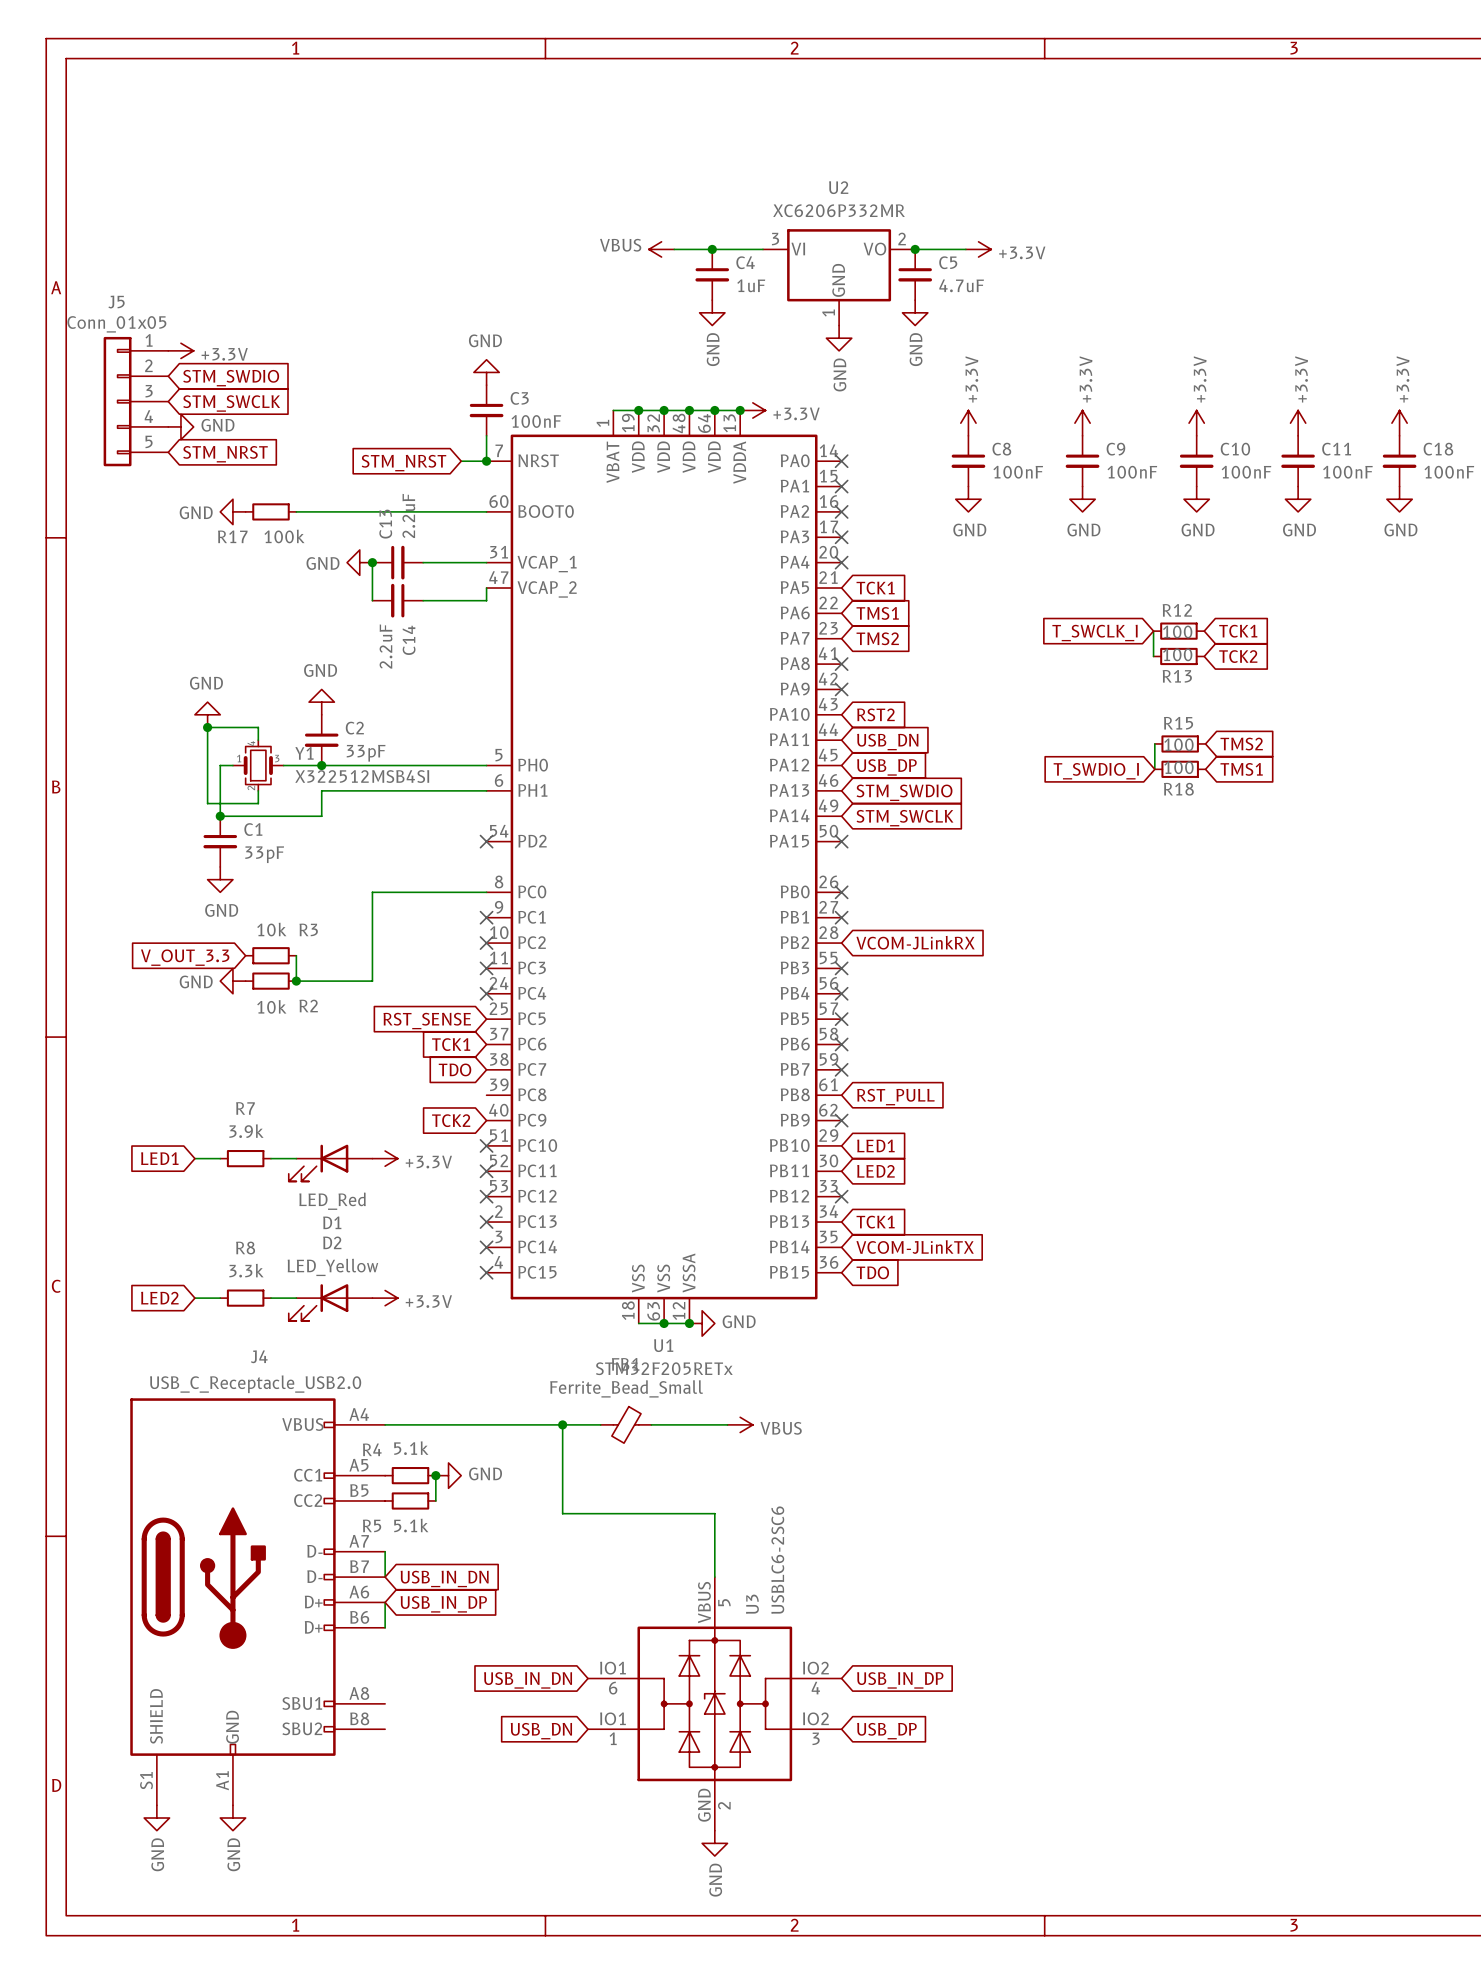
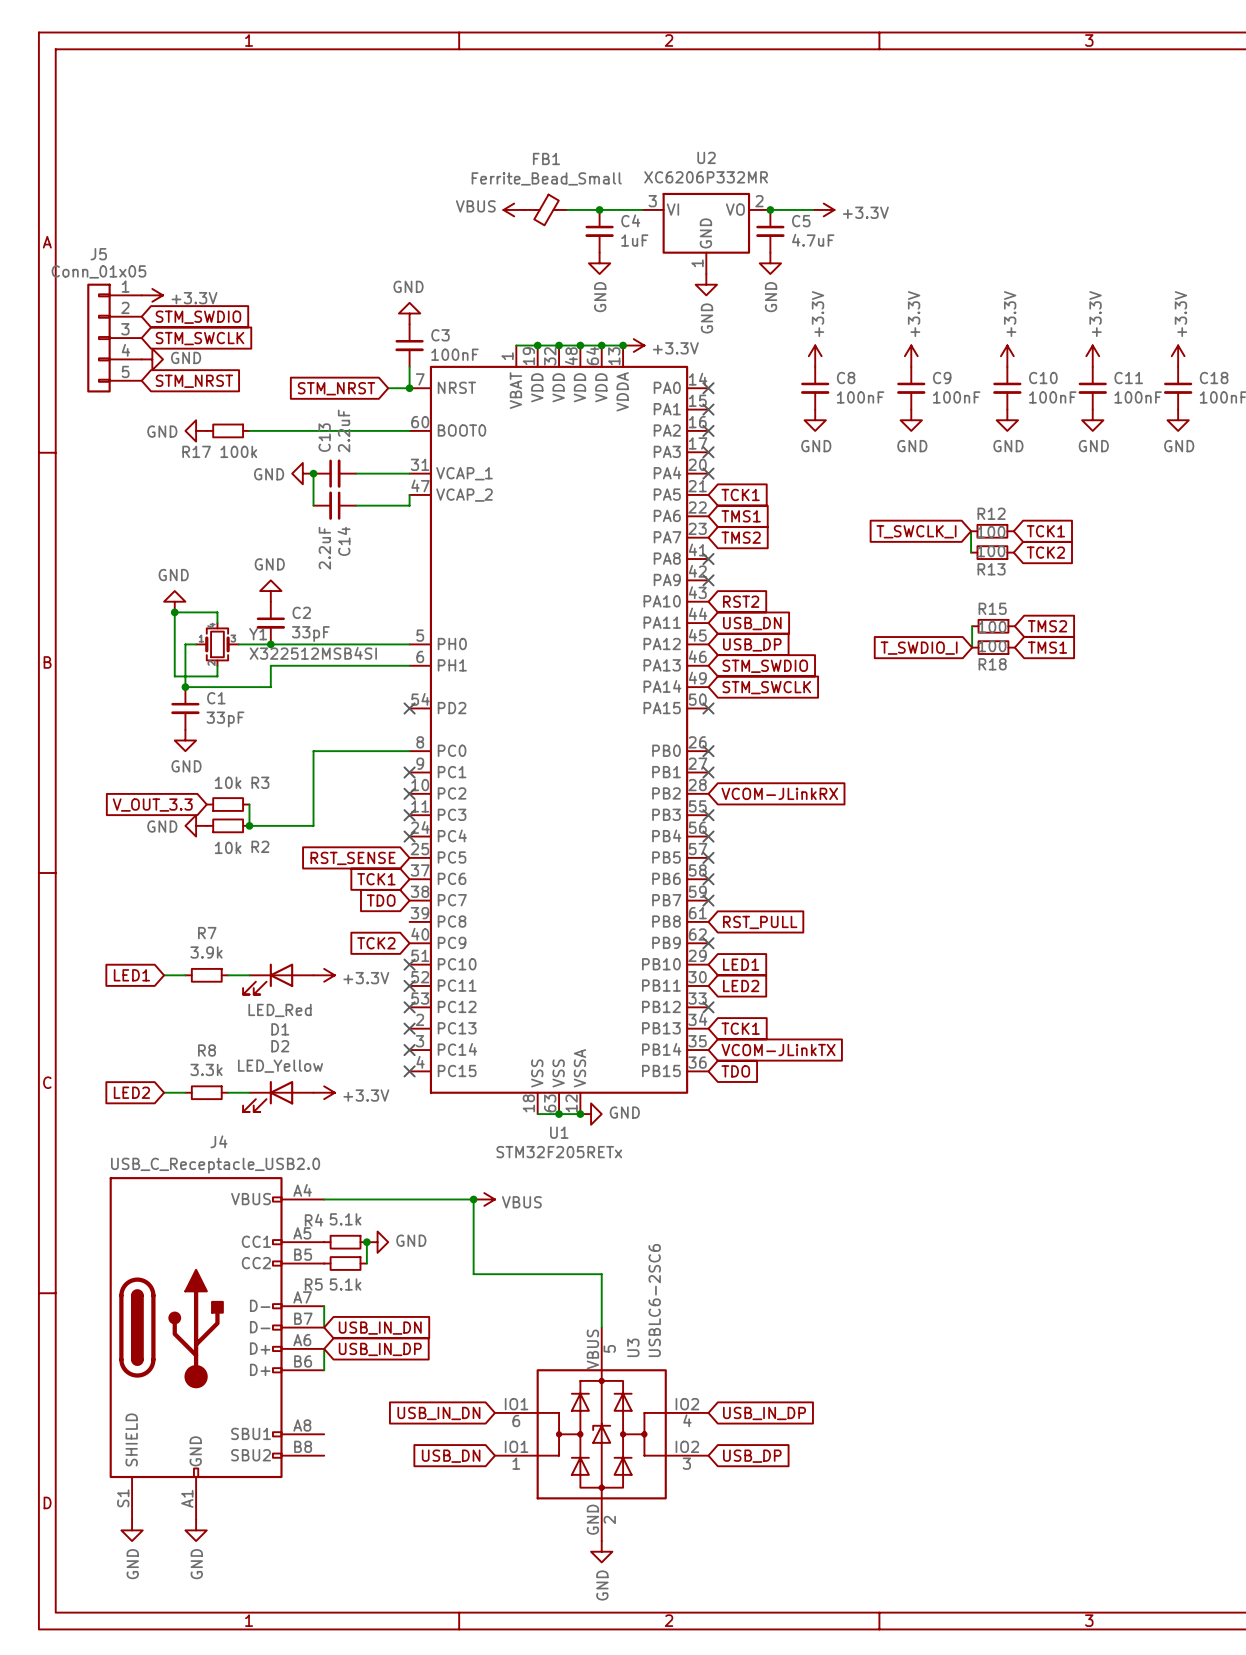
power symbol position: VBUS (661, 249) -> VBUS (514, 209)
FB1 position: (626, 1424) -> (546, 209)
wire: (651, 1424) (727, 1424) -> none
power symbol position: VBUS (740, 1424) -> VBUS (484, 1199)

